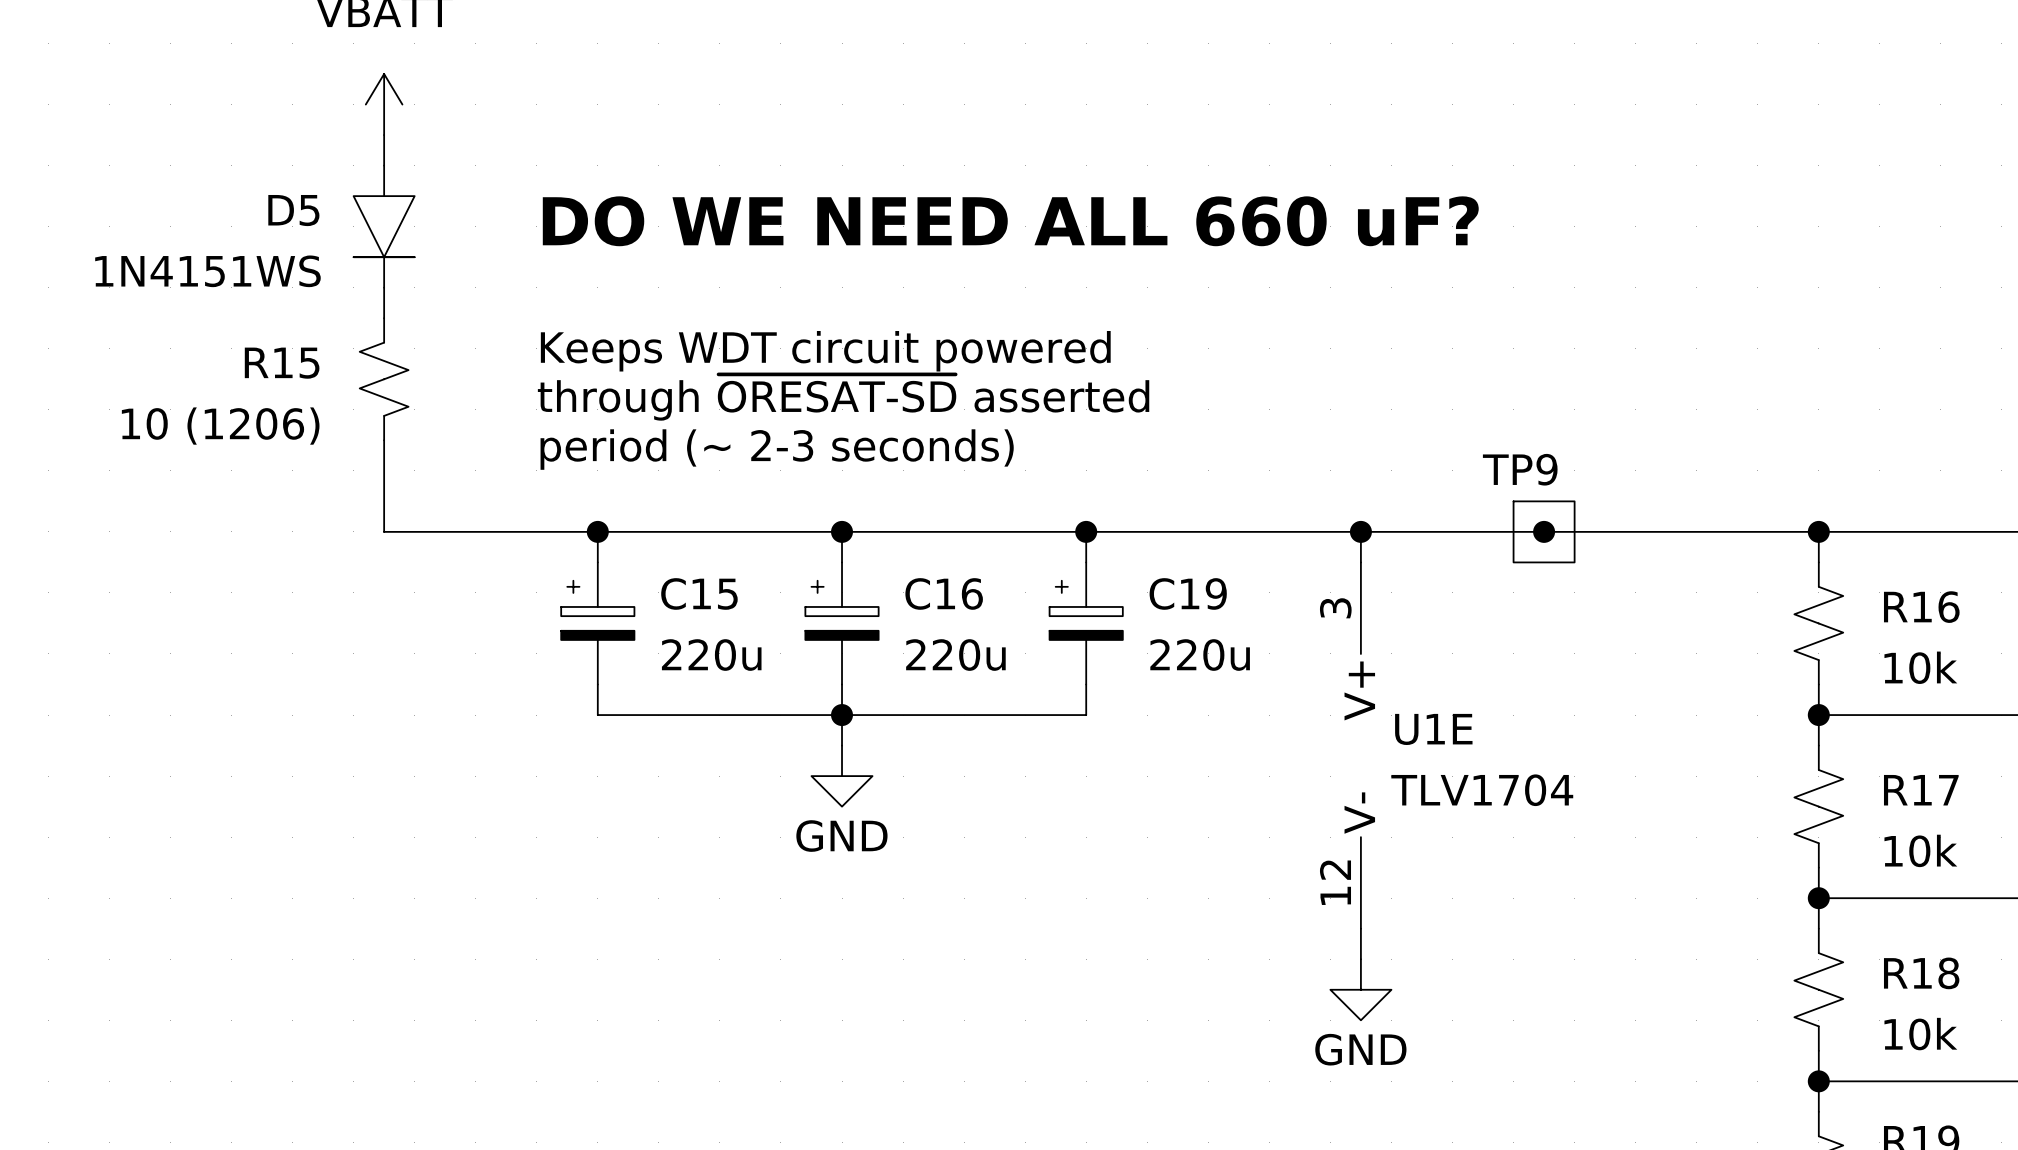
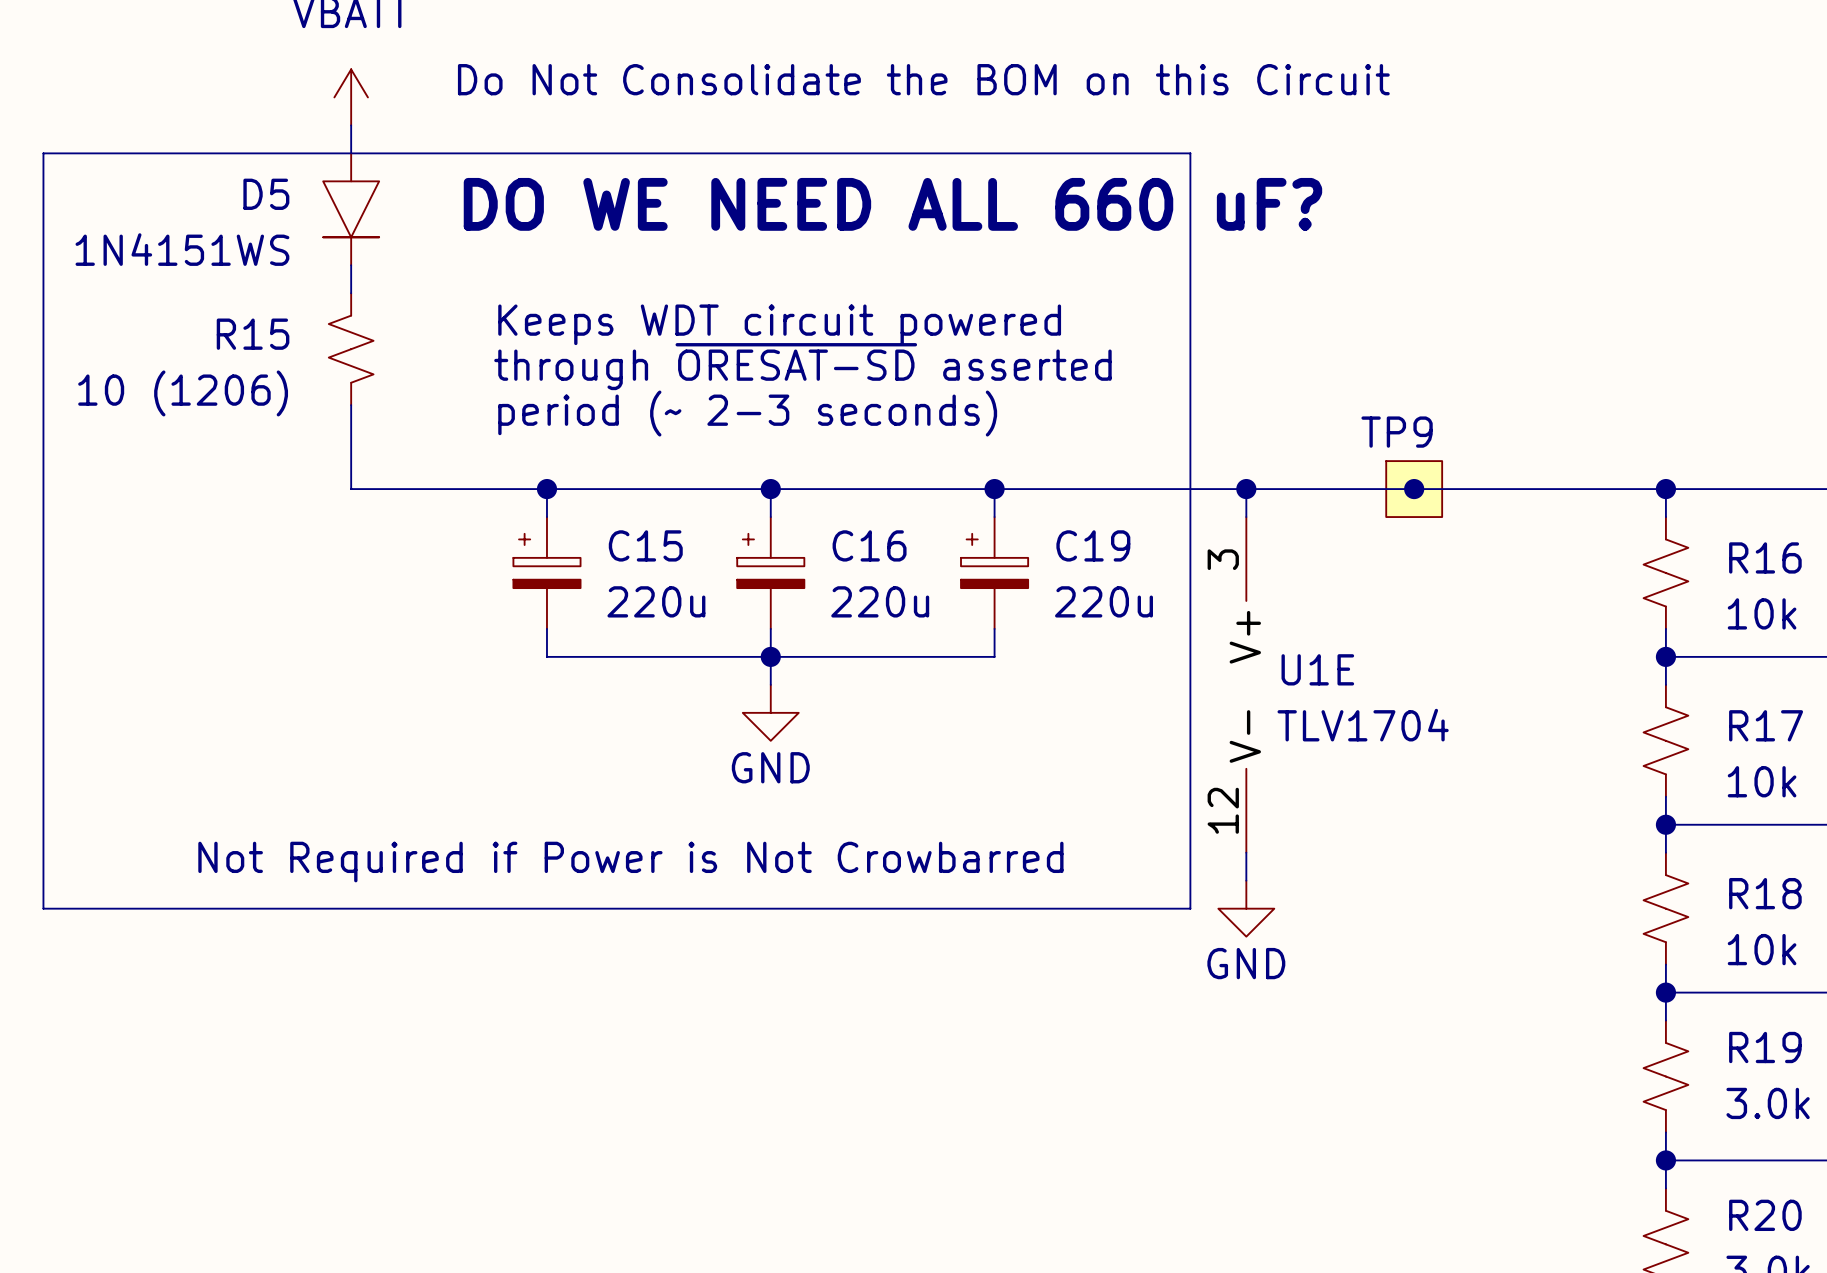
text: none -> Do Not Consolidate the BOM on this Circuit (923, 79)
line: none -> (43, 153) (1190, 153) (1190, 908) (43, 908) (43, 153)
text position: DO WE NEED ALL 660 uF? (1010, 221) -> DO WE NEED ALL 660 uF? (892, 204)
text: none -> Not Required if Power is Not Crowbarred (630, 862)

